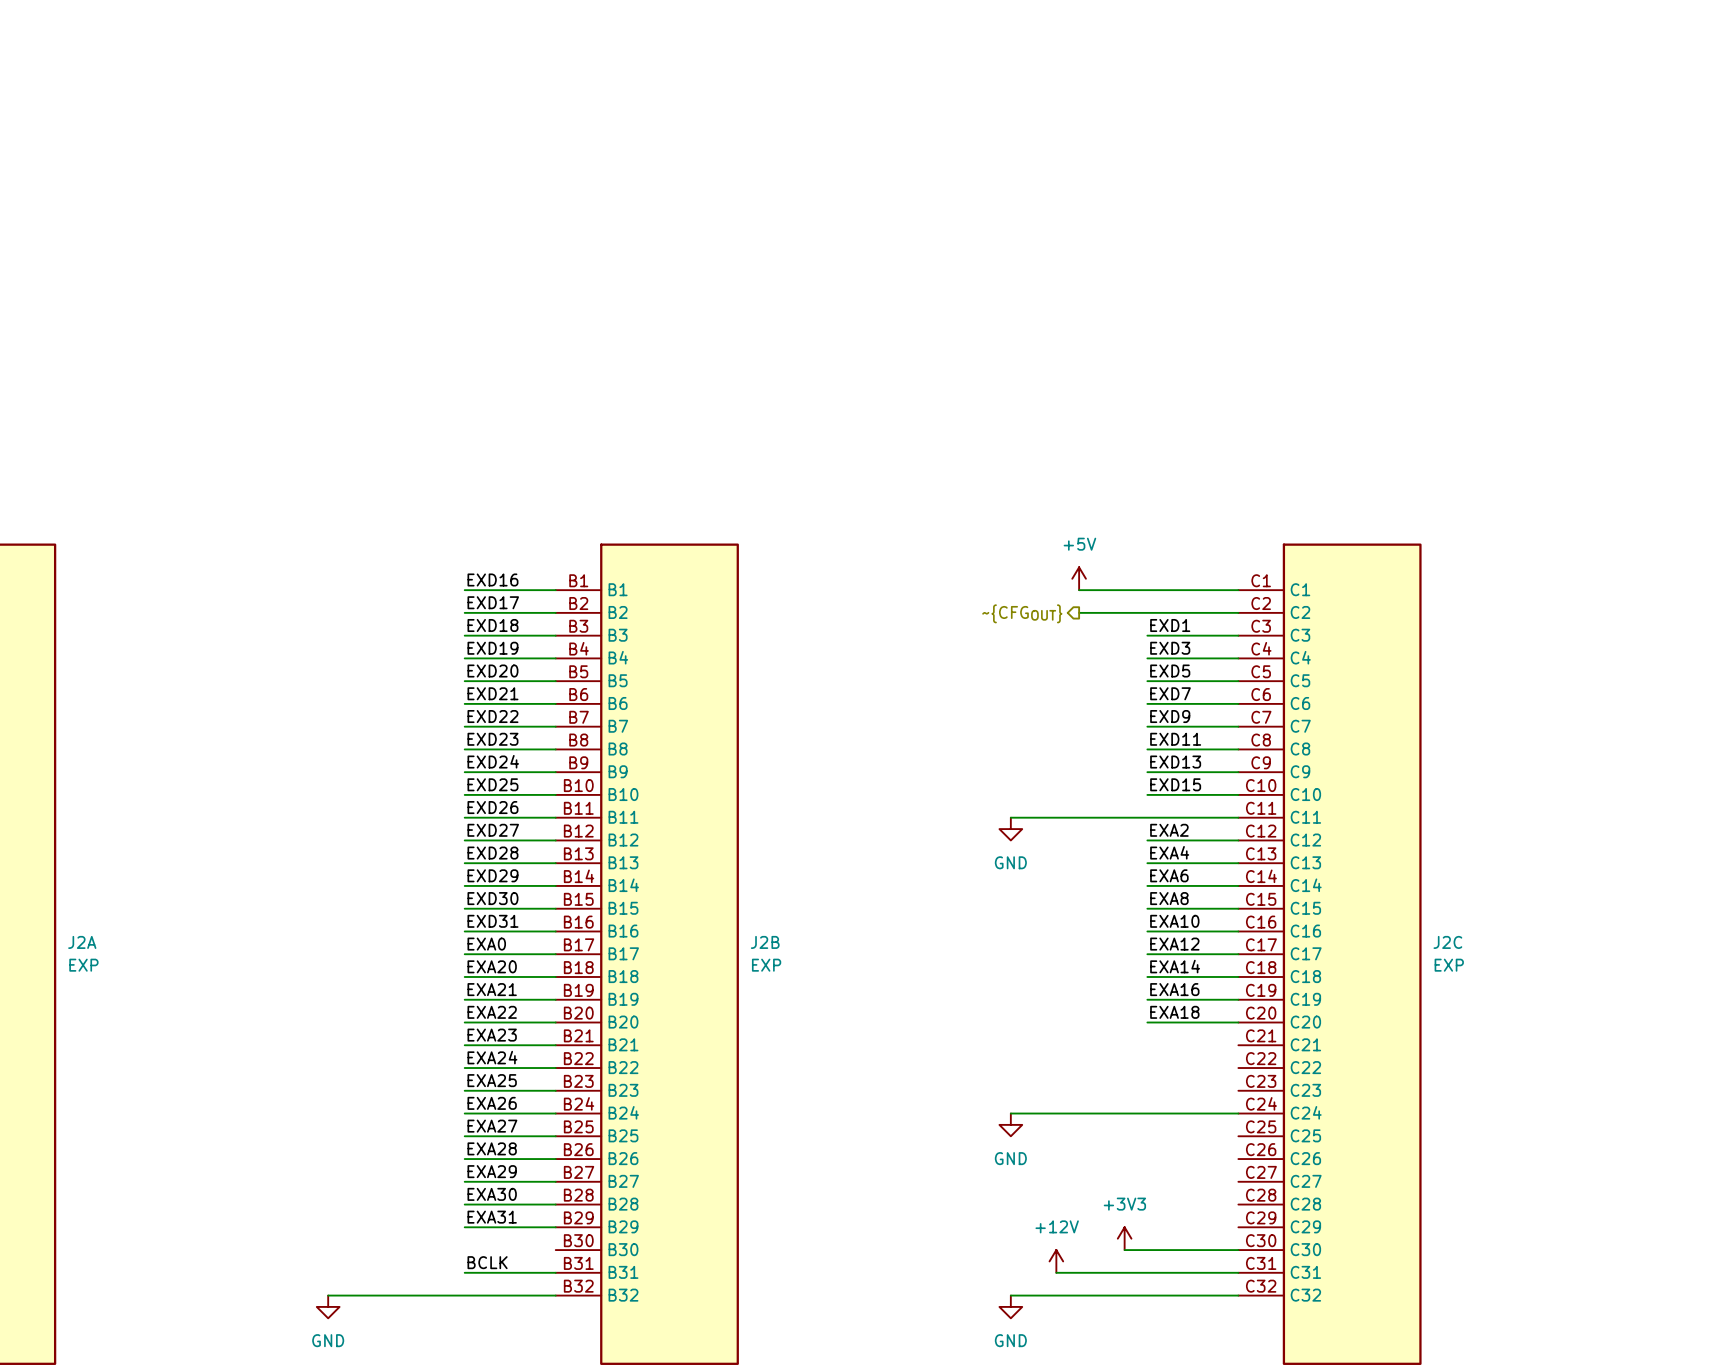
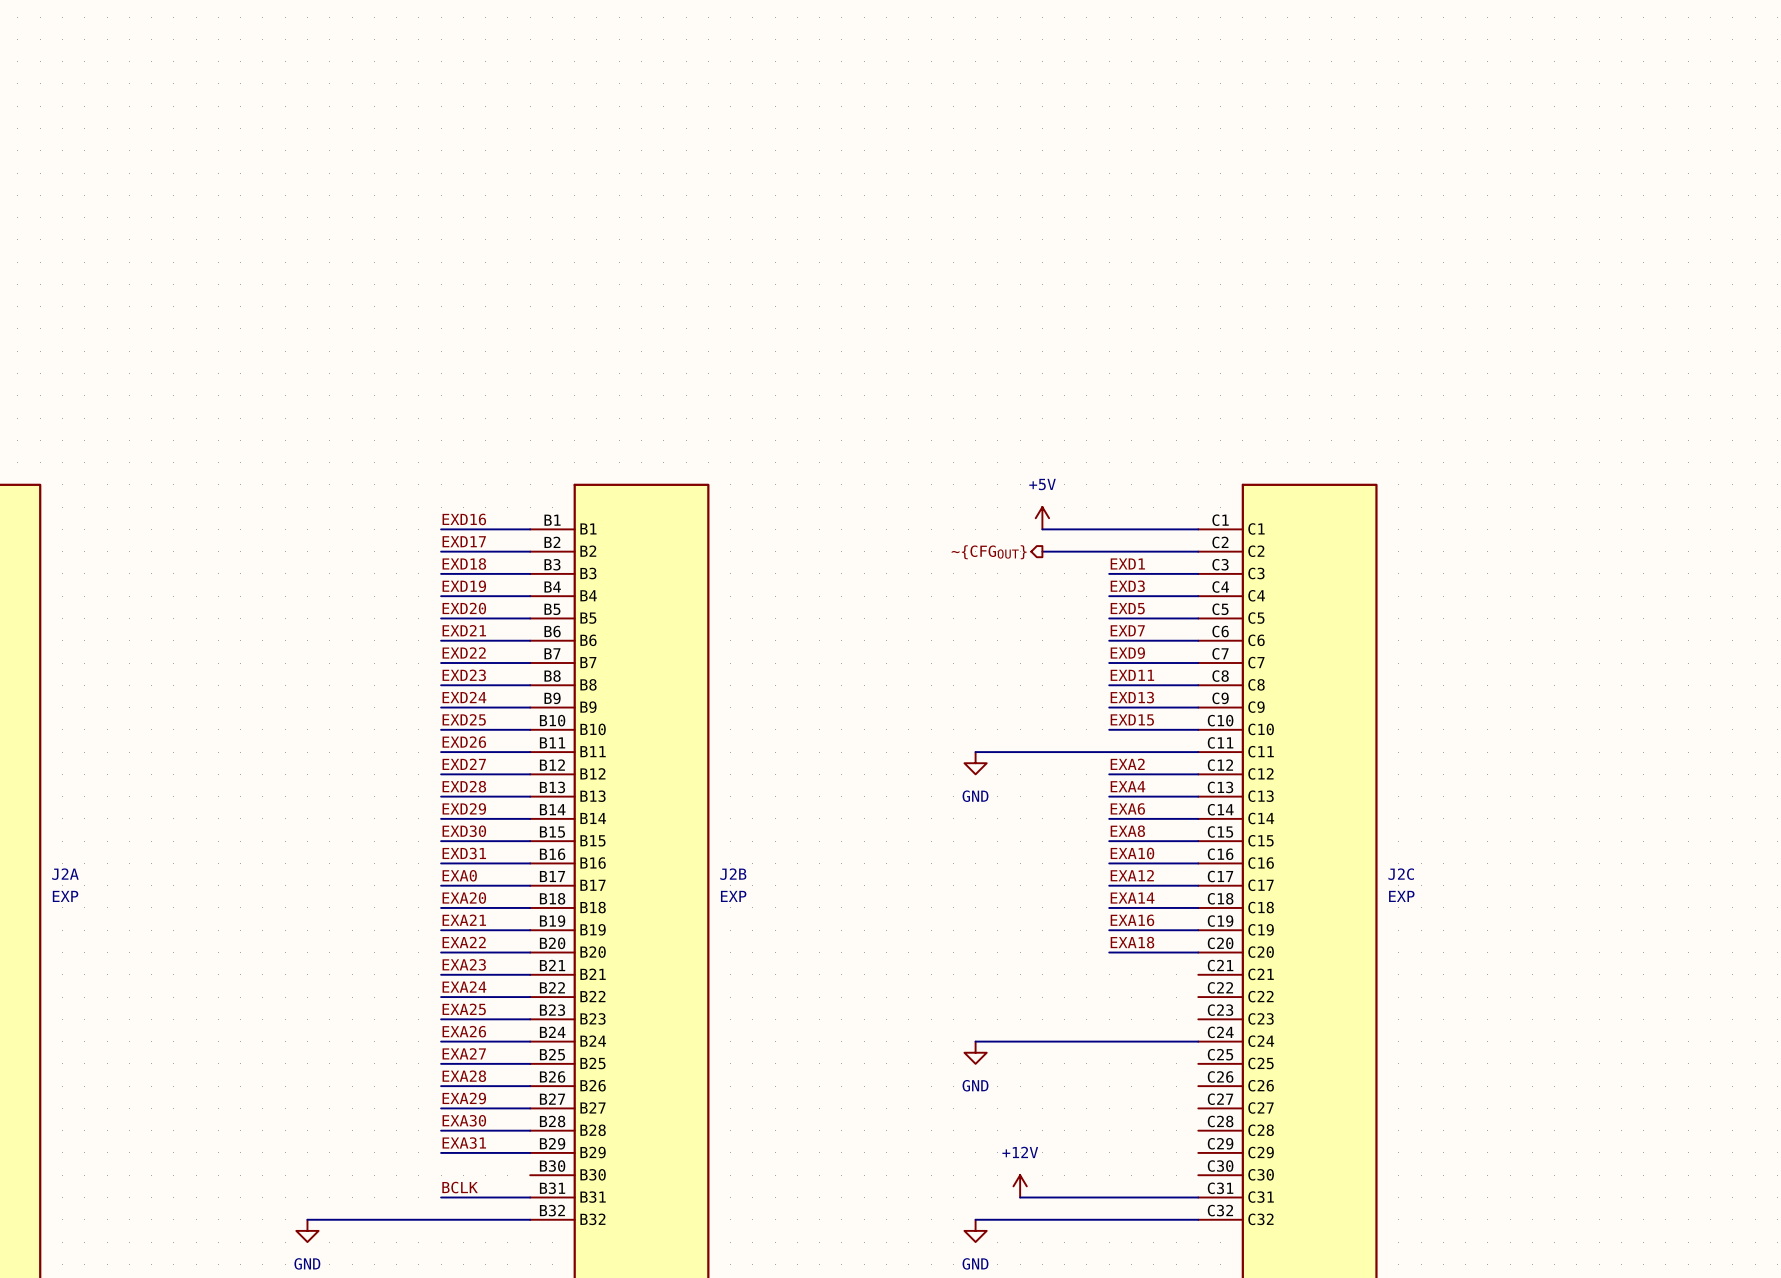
power symbol: +3V3 (1124, 1238) -> none
wire: (1124, 1250) (1238, 1250) -> none

